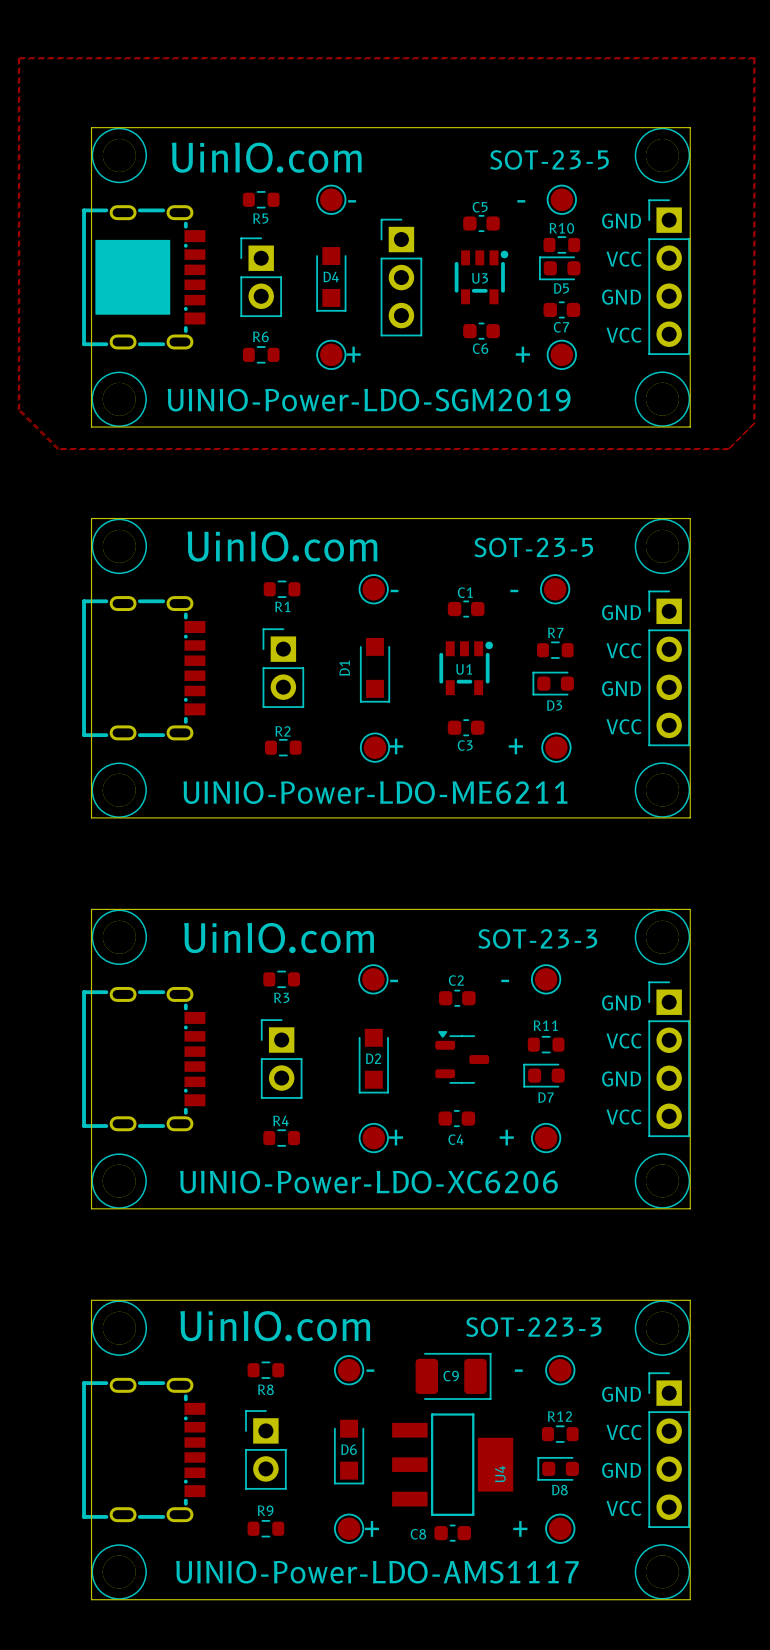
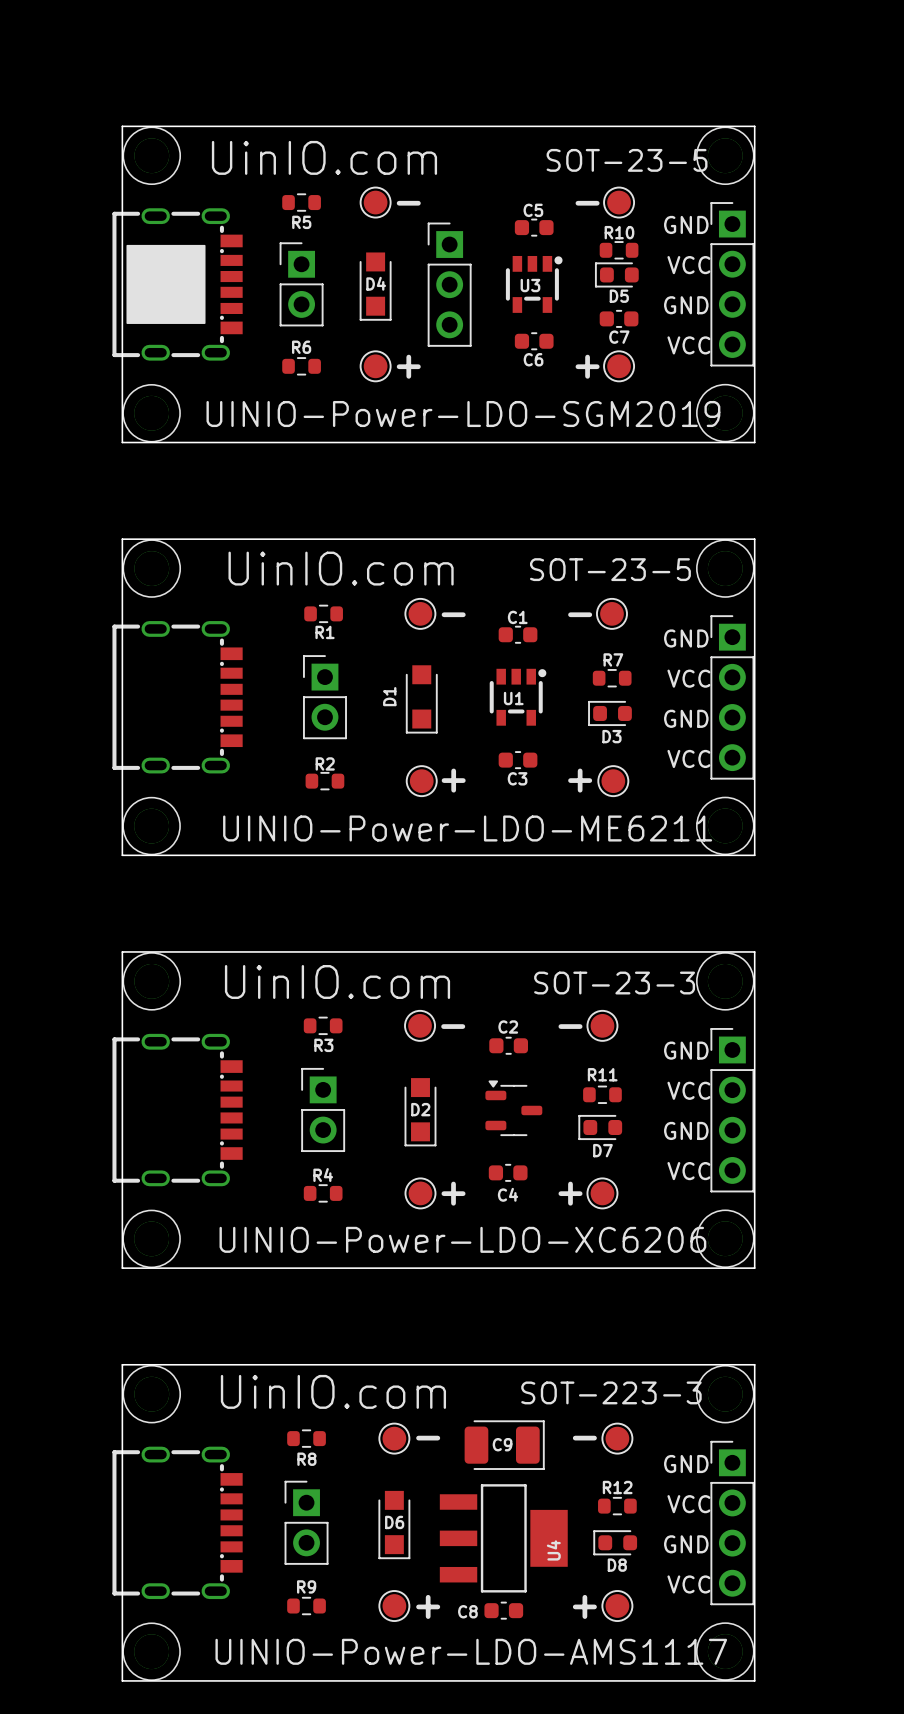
zone outline: (19, 57) (19, 409) (58, 448) (729, 448) (754, 423) (754, 57) (19, 57) -> none
zone outline: (18, 58) (18, 410) (57, 449) (728, 449) (753, 423) (753, 58) (18, 58) -> none

